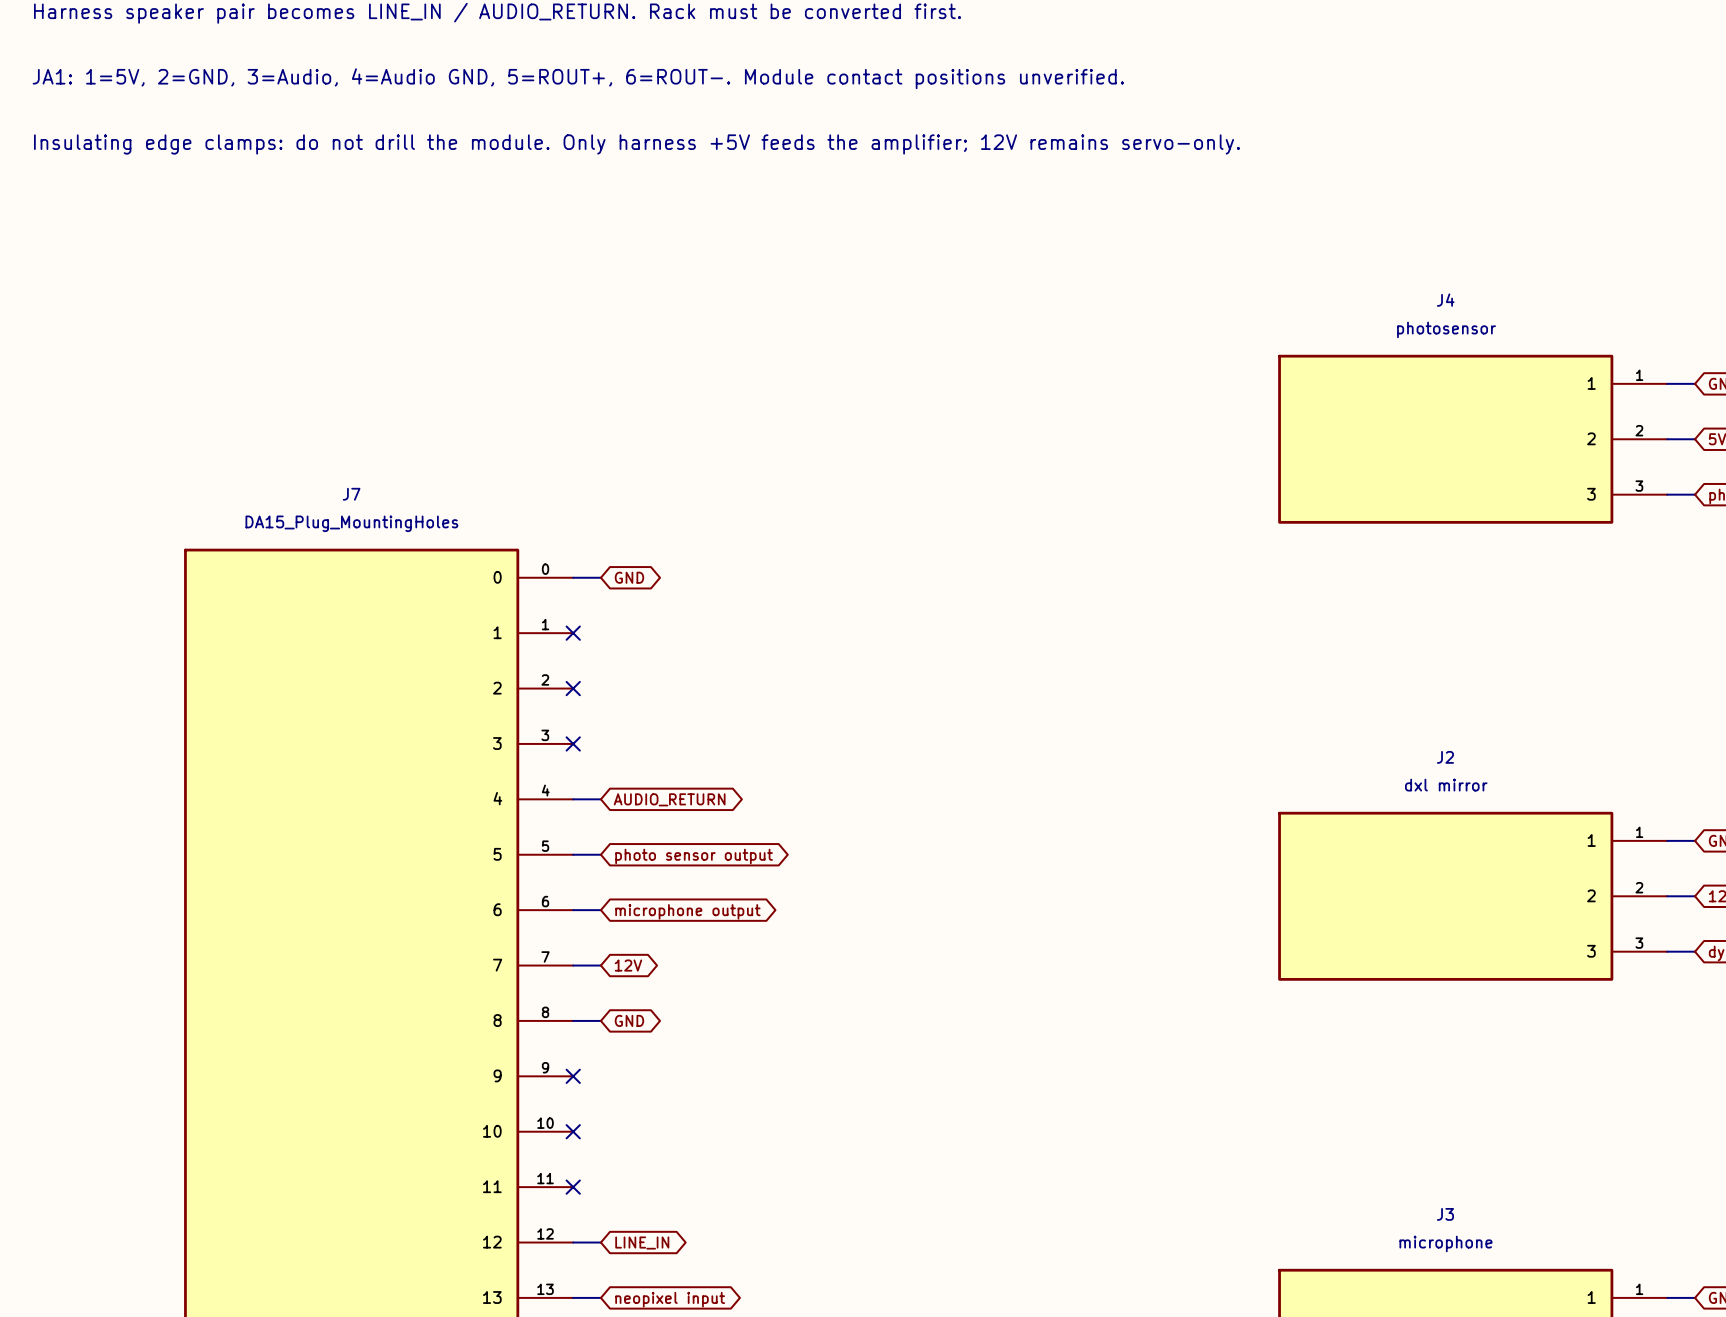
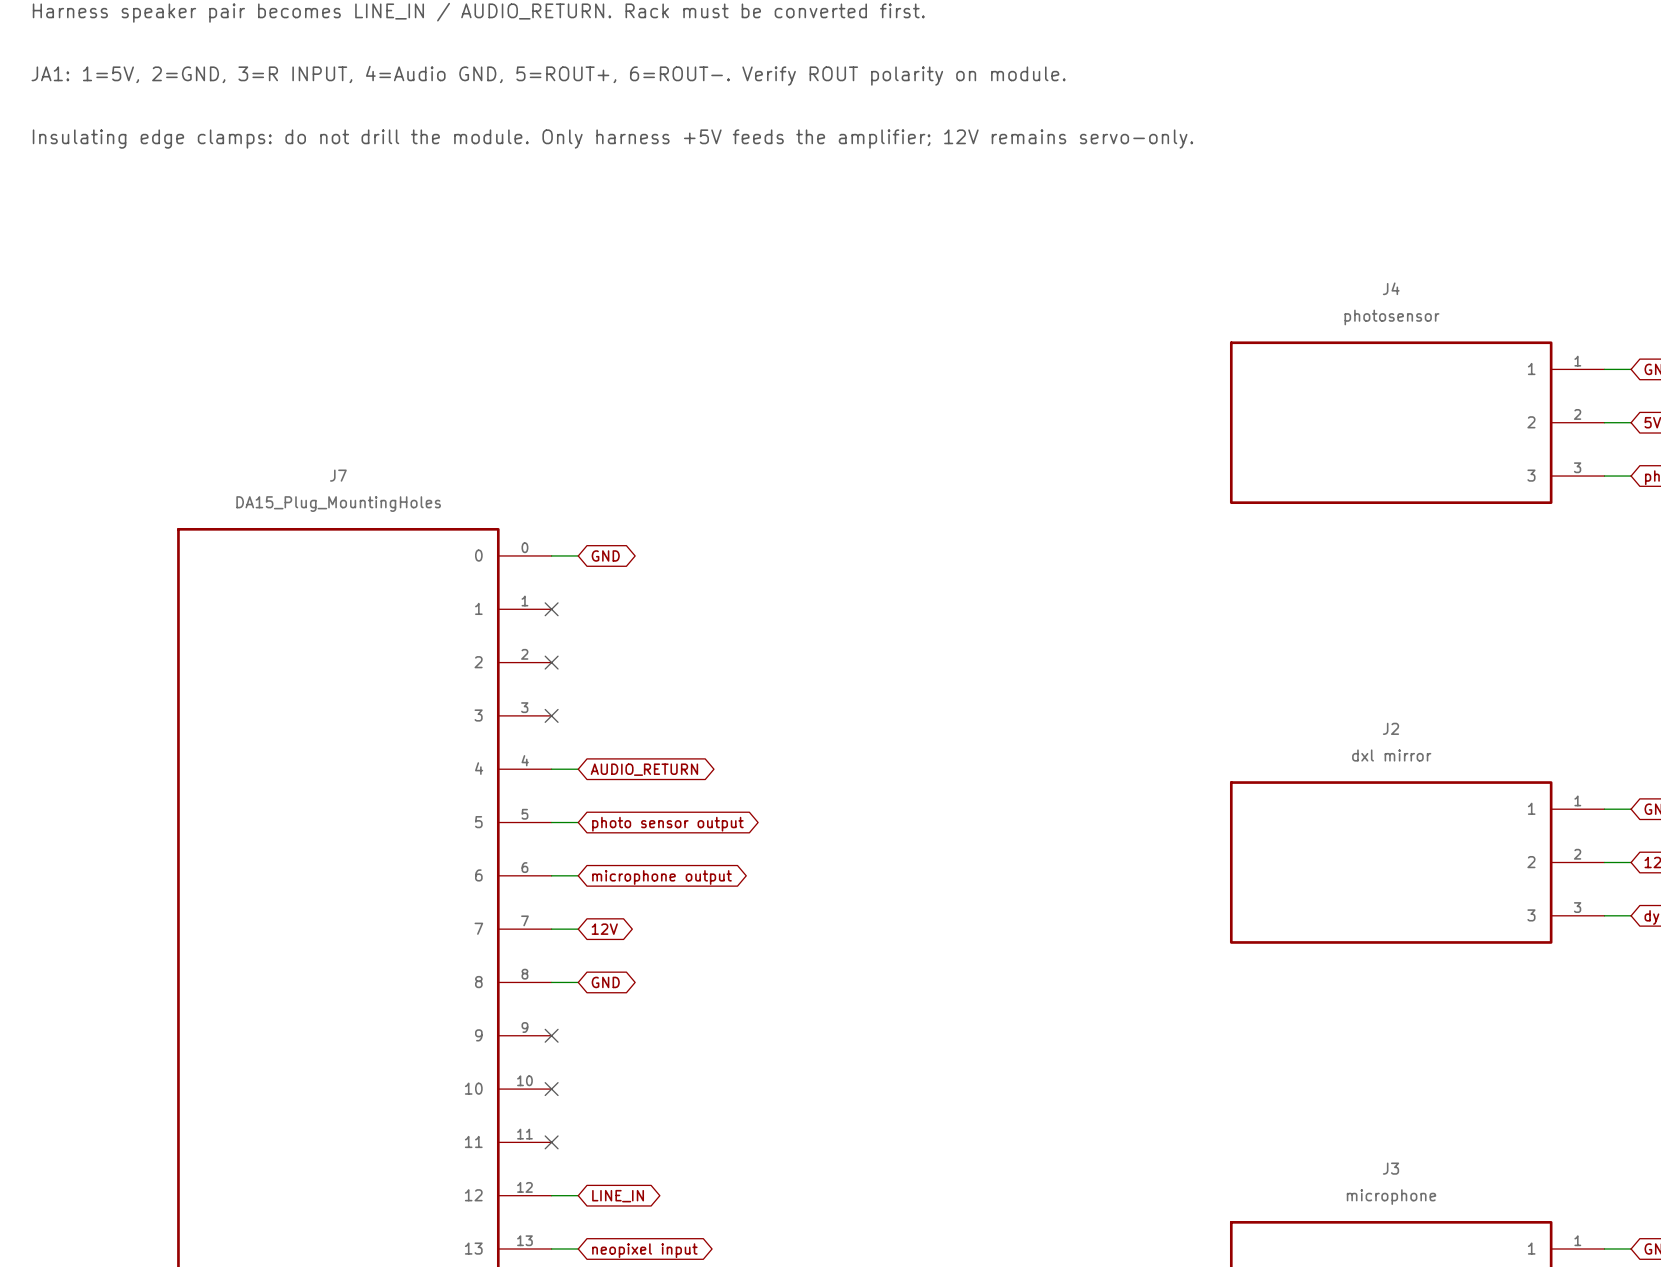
text: JA1: 1=5V, 2=GND, 3=Audio, 4=Audio GND, 5=ROUT+, 6=ROUT-. Module contact positions unverified. (578, 78) -> JA1: 1=5V, 2=GND, 3=R INPUT, 4=Audio GND, 5=ROUT+, 6=ROUT-. Verify ROUT polarity on module. (548, 75)

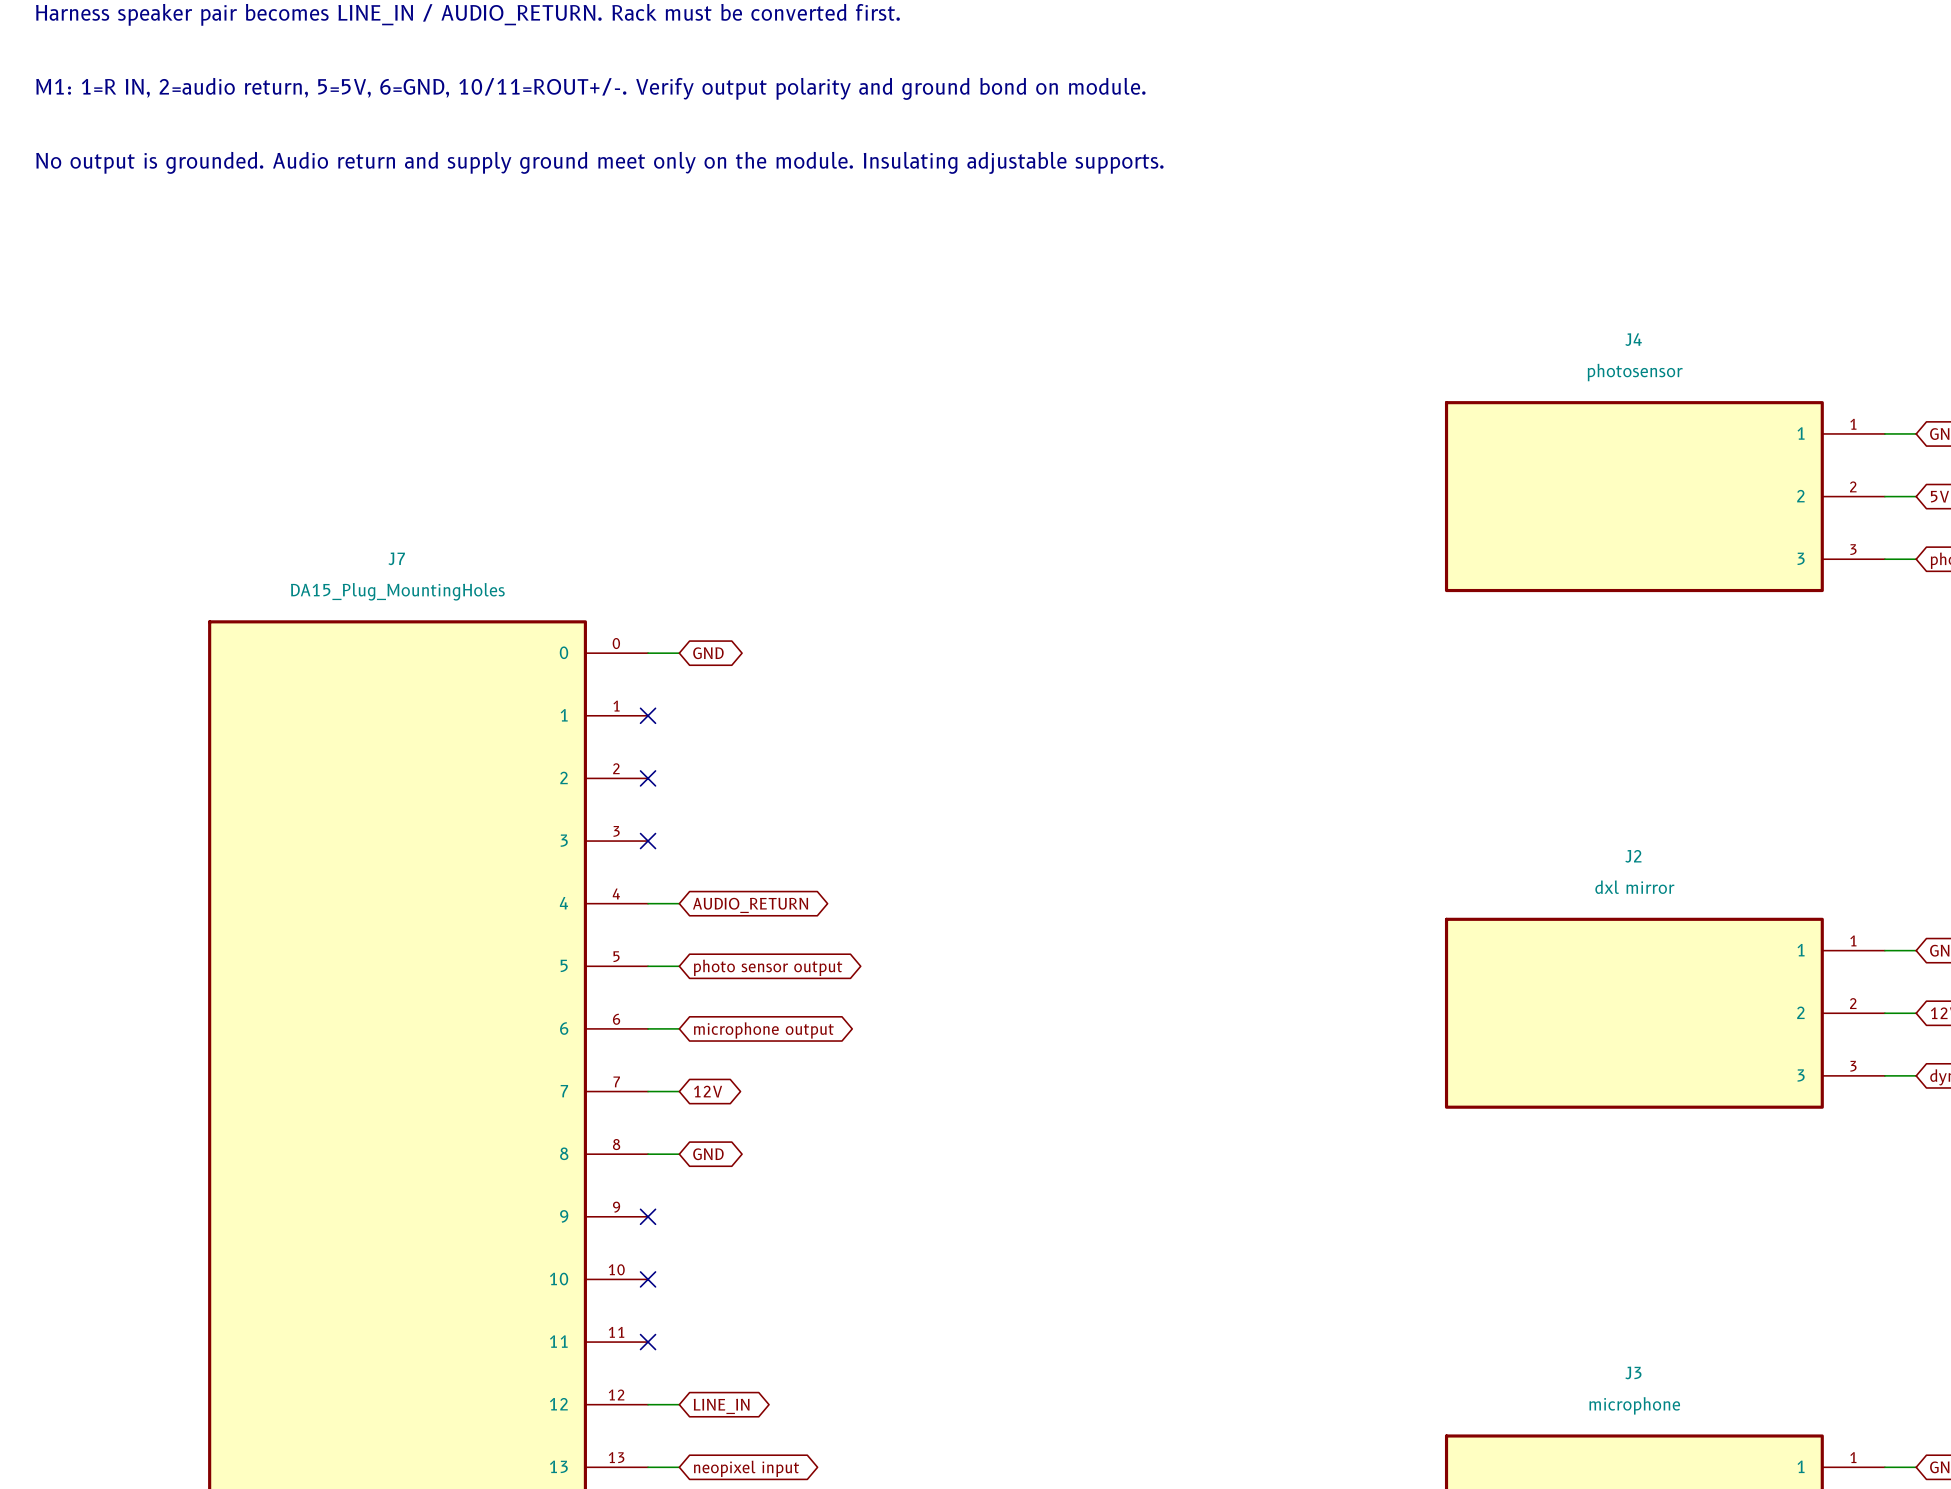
text: JA1: 1=5V, 2=GND, 3=R INPUT, 4=Audio GND, 5=ROUT+, 6=ROUT-. Verify ROUT polarity on module. (548, 75) -> M1: 1=R IN, 2=audio return, 5=5V, 6=GND, 10/11=ROUT+/-. Verify output polarity and ground bond on module. (590, 88)
text: Insulating edge clamps: do not drill the module. Only harness +5V feeds the amplifier; 12V remains servo-only. (612, 139) -> No output is grounded. Audio return and supply ground meet only on the module. Insulating adjustable supports. (599, 162)

